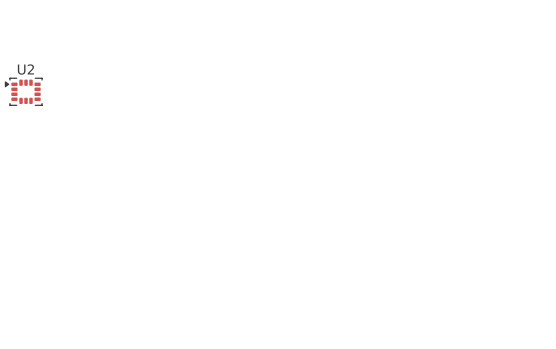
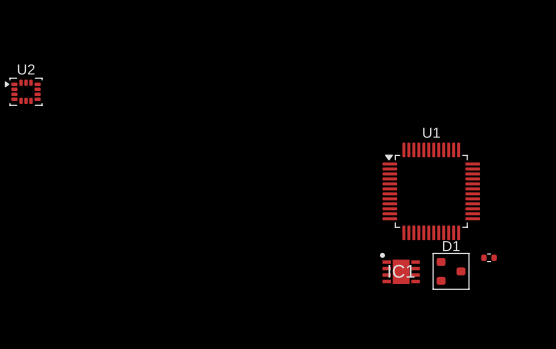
U1: none -> (431, 191)
part: none -> (489, 257)
IC1: none -> (399, 268)
D1: none -> (451, 271)

